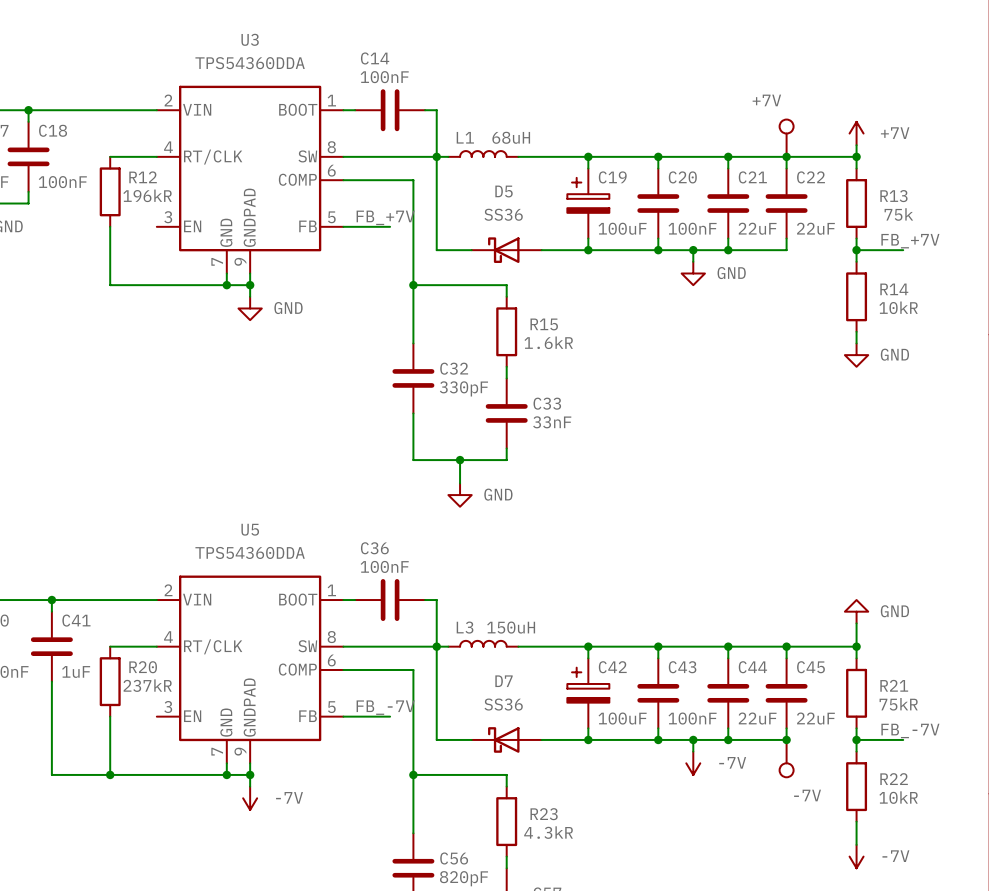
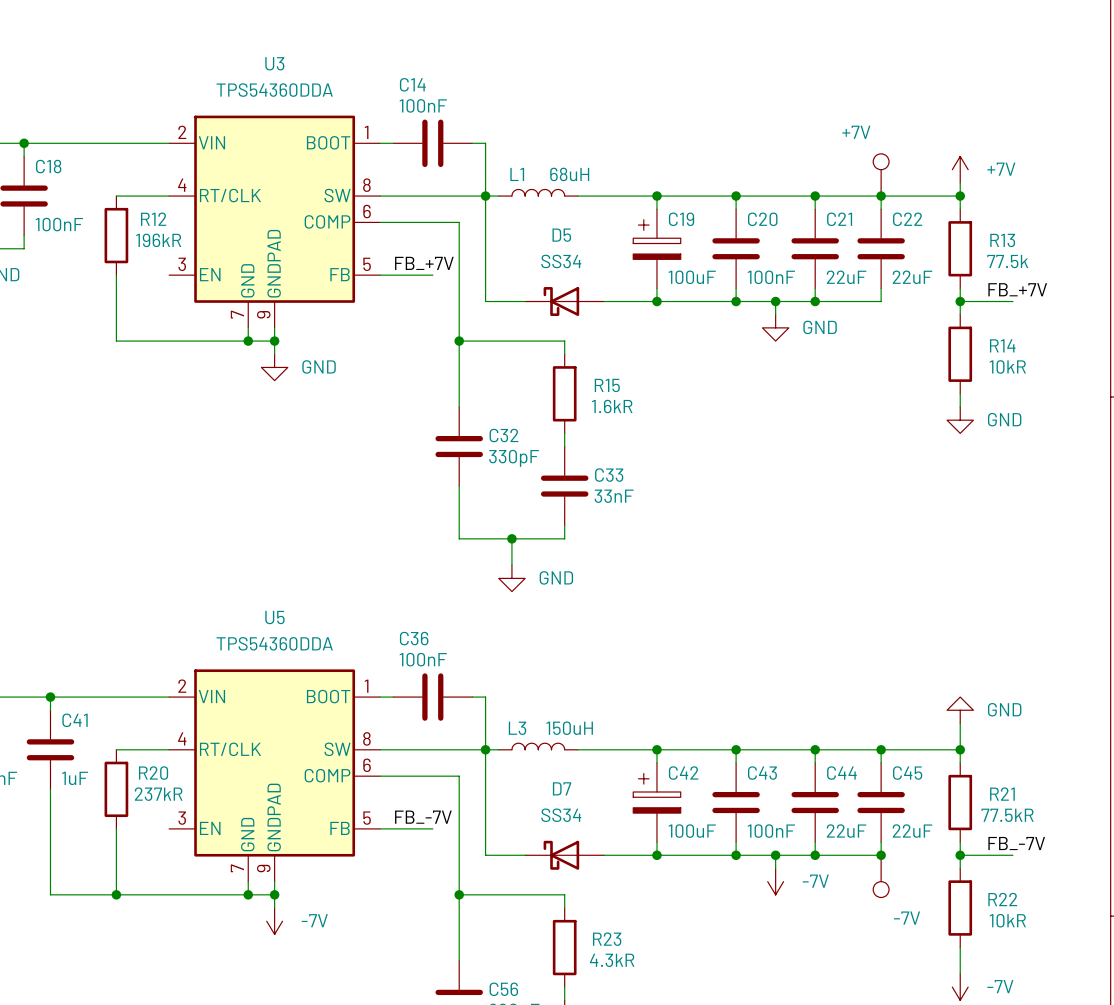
D5 value: SS36 (503, 214) -> SS34 (561, 261)
R13 value: 75k (898, 214) -> 77.5k (1007, 261)
D7 value: SS36 (503, 704) -> SS34 (561, 815)
R21 value: 75kR (898, 704) -> 77.5kR (1007, 815)

